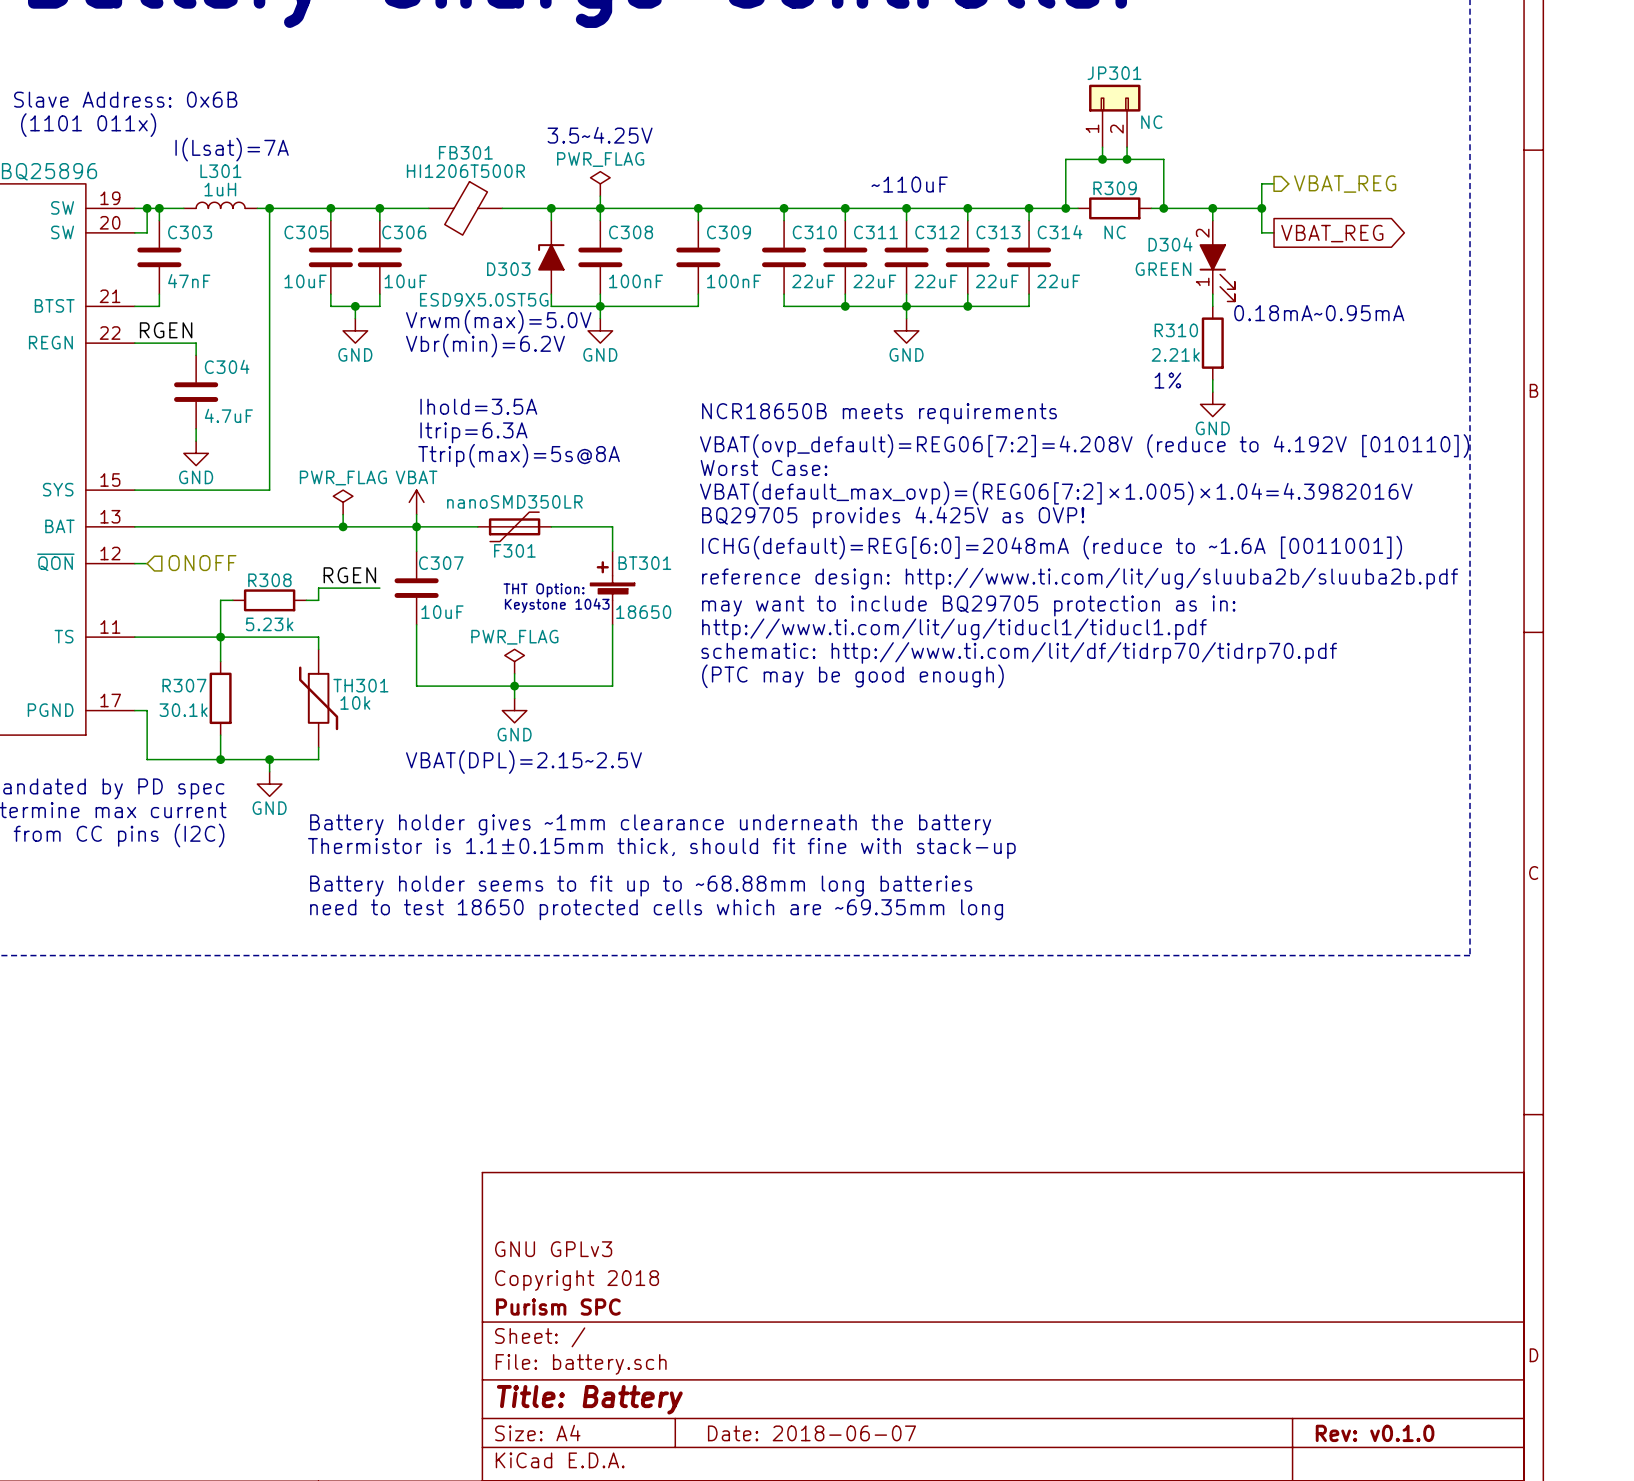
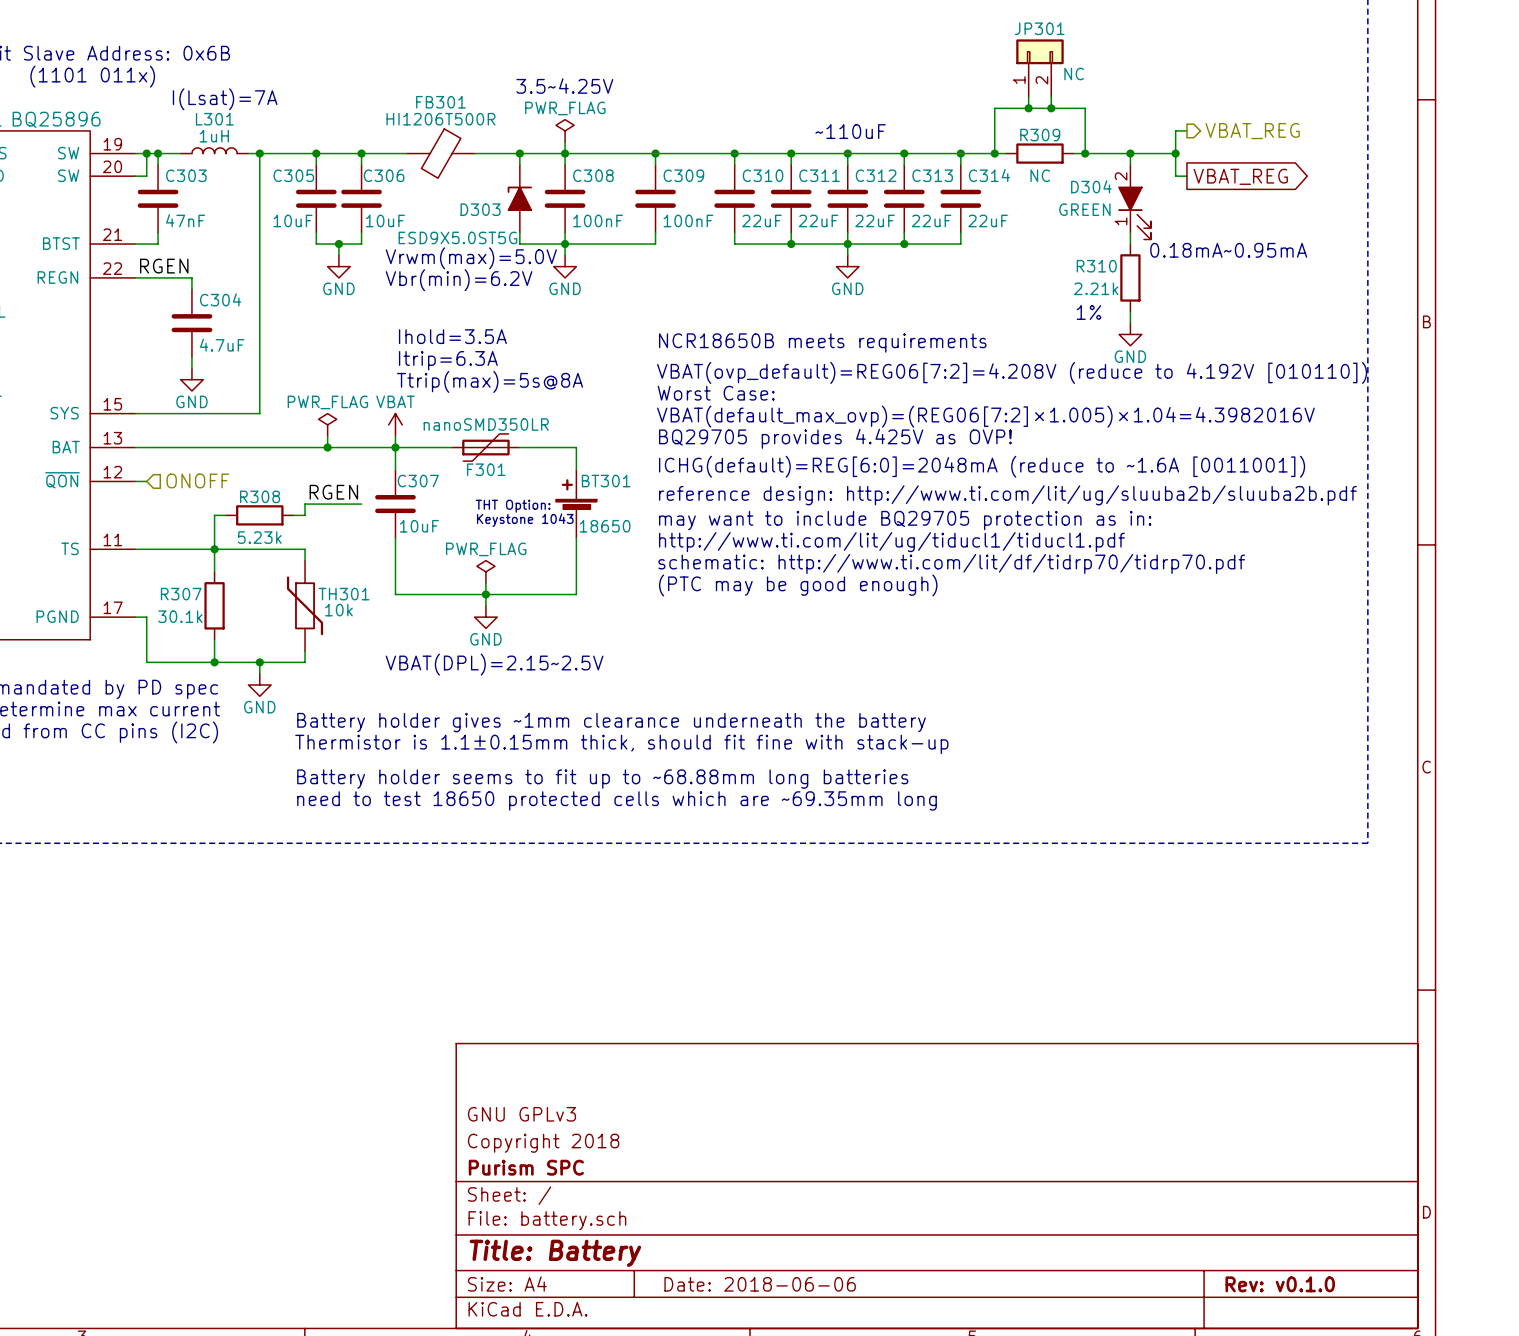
title block: Date: 2018-06-07 (811, 1433) -> Date: 2018-06-06 (760, 1284)

